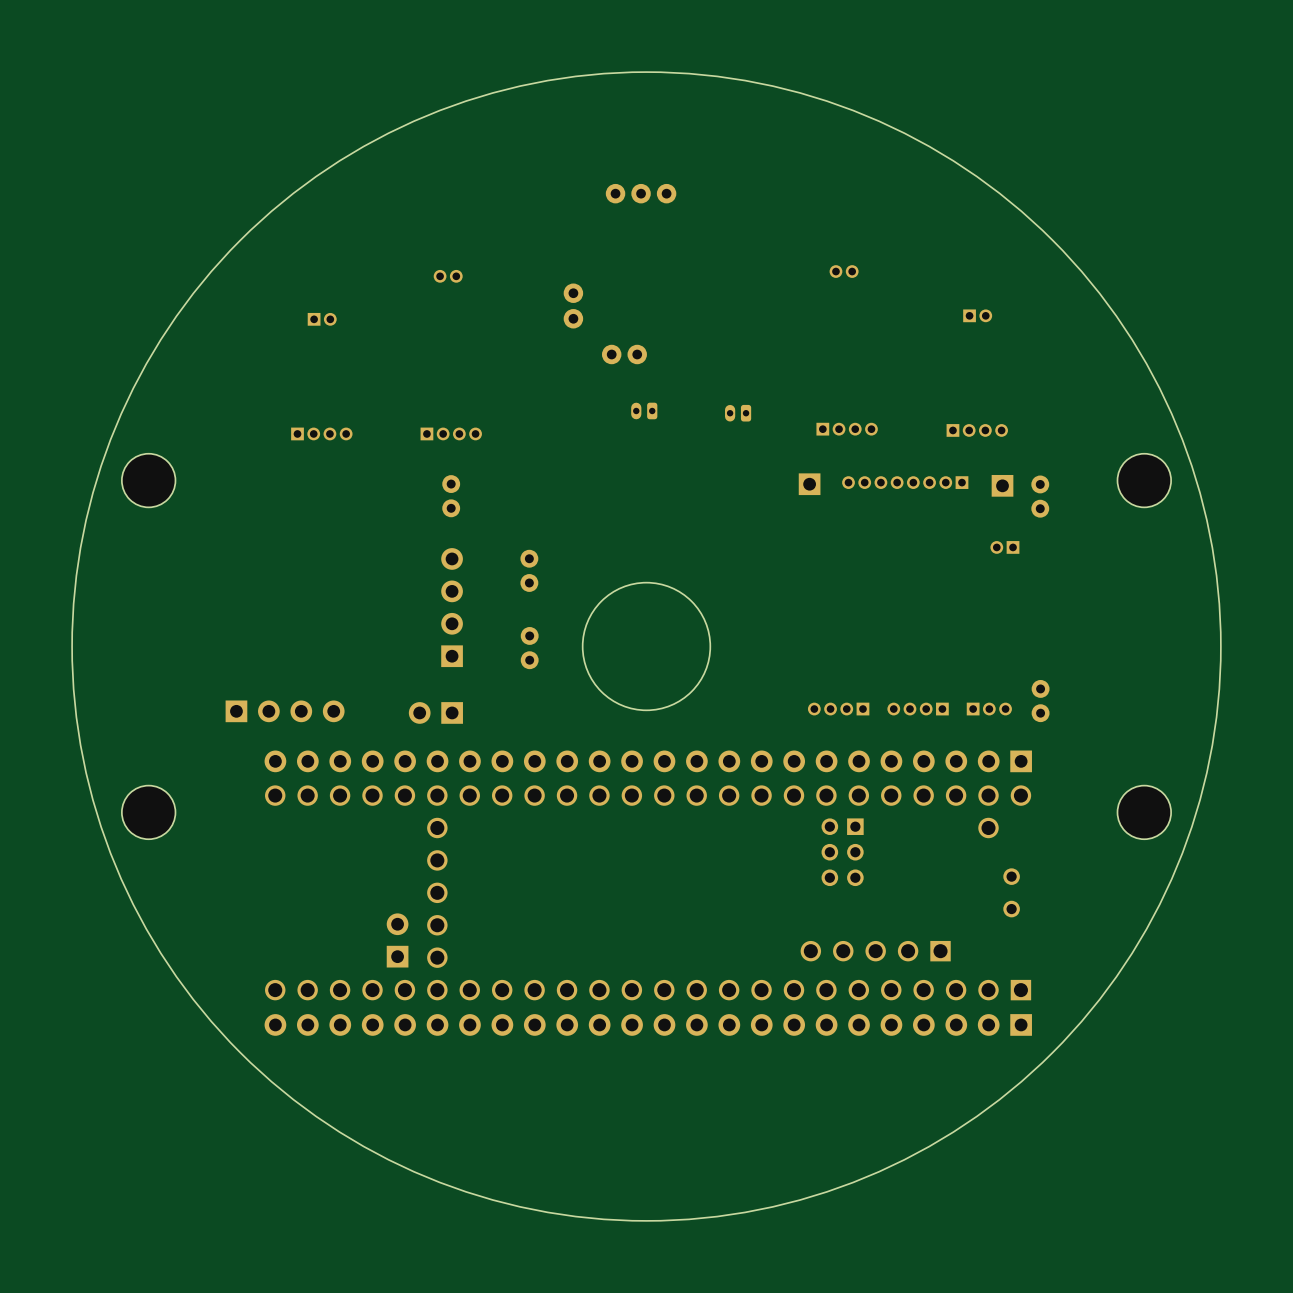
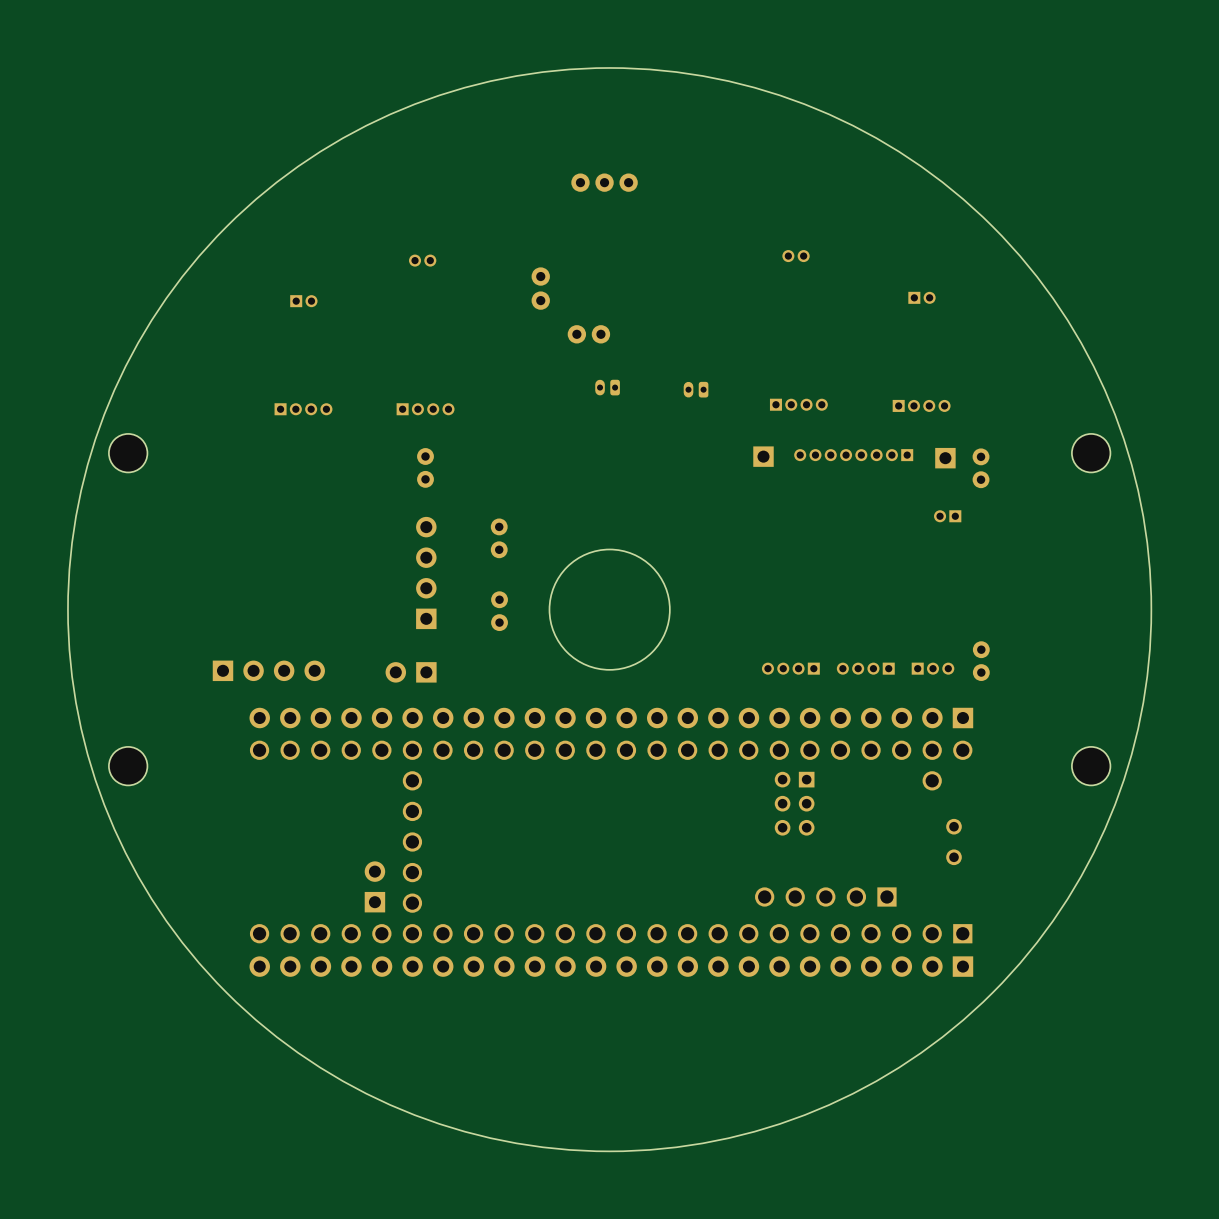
part footprint: [121, 453, 176, 508] -> [108, 433, 148, 473]
part footprint: [1117, 453, 1172, 508] -> [1071, 433, 1111, 473]
part footprint: [121, 785, 176, 840] -> [108, 746, 148, 786]
part footprint: [1117, 785, 1172, 840] -> [1071, 746, 1111, 786]

